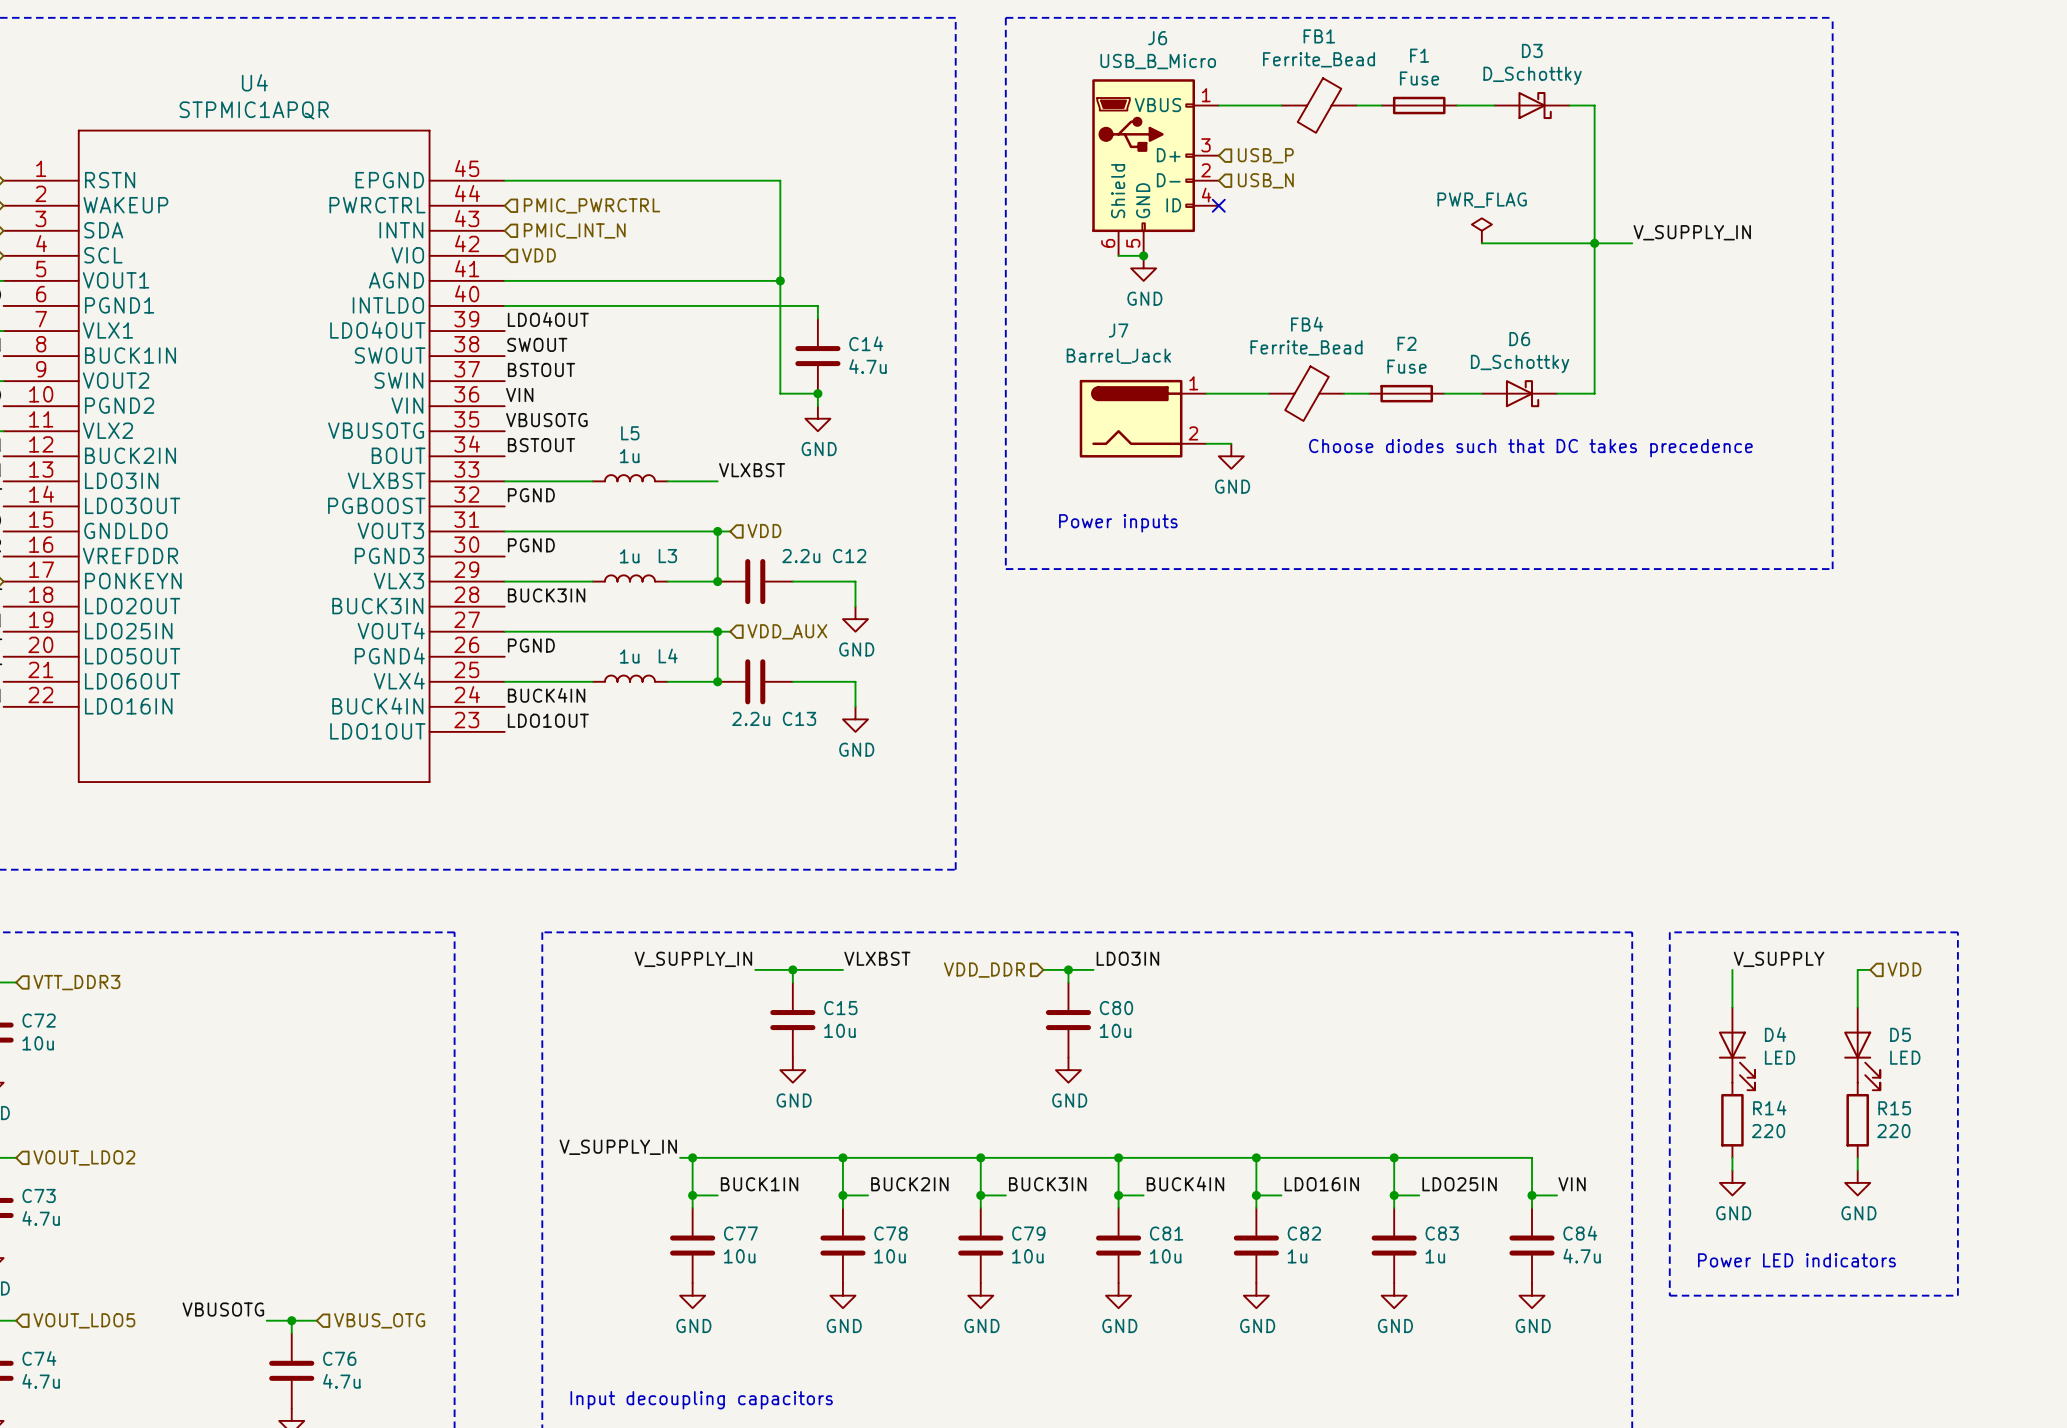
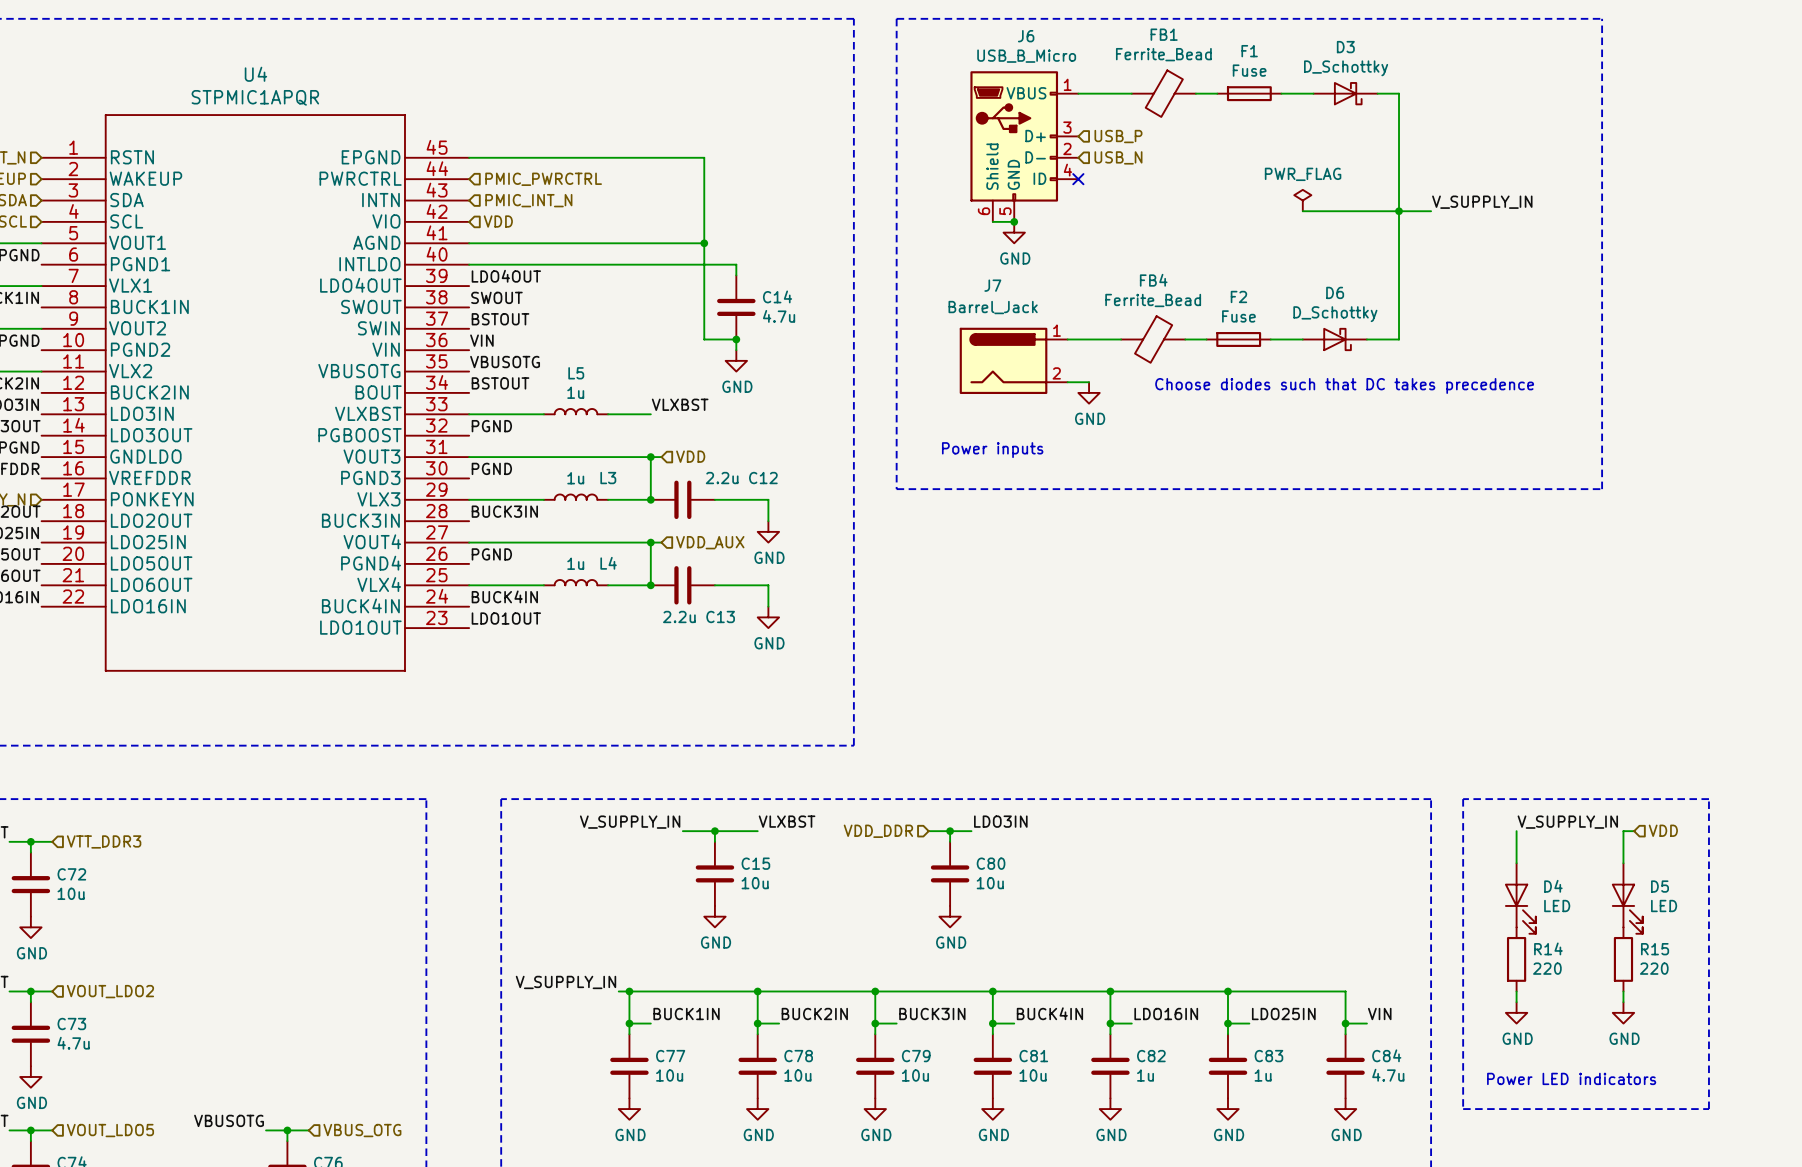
label: V_SUPPLY (1779, 959) -> V_SUPPLY_IN (1567, 822)

